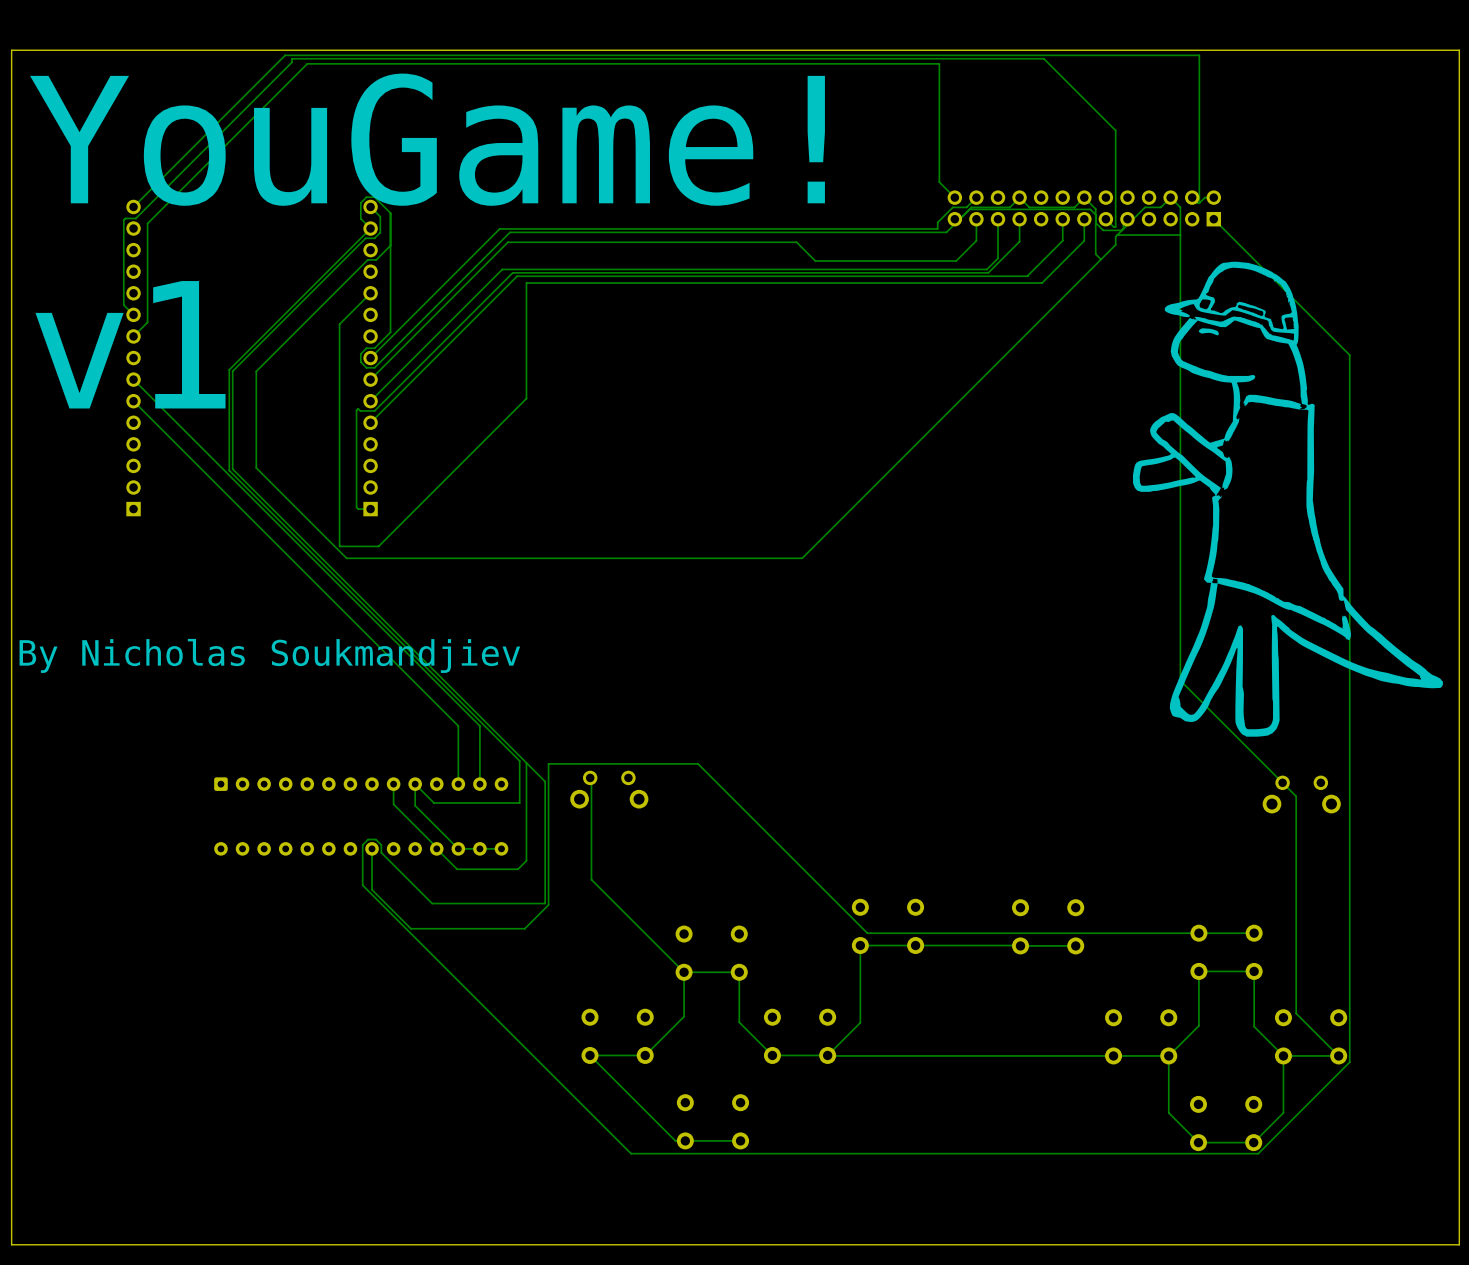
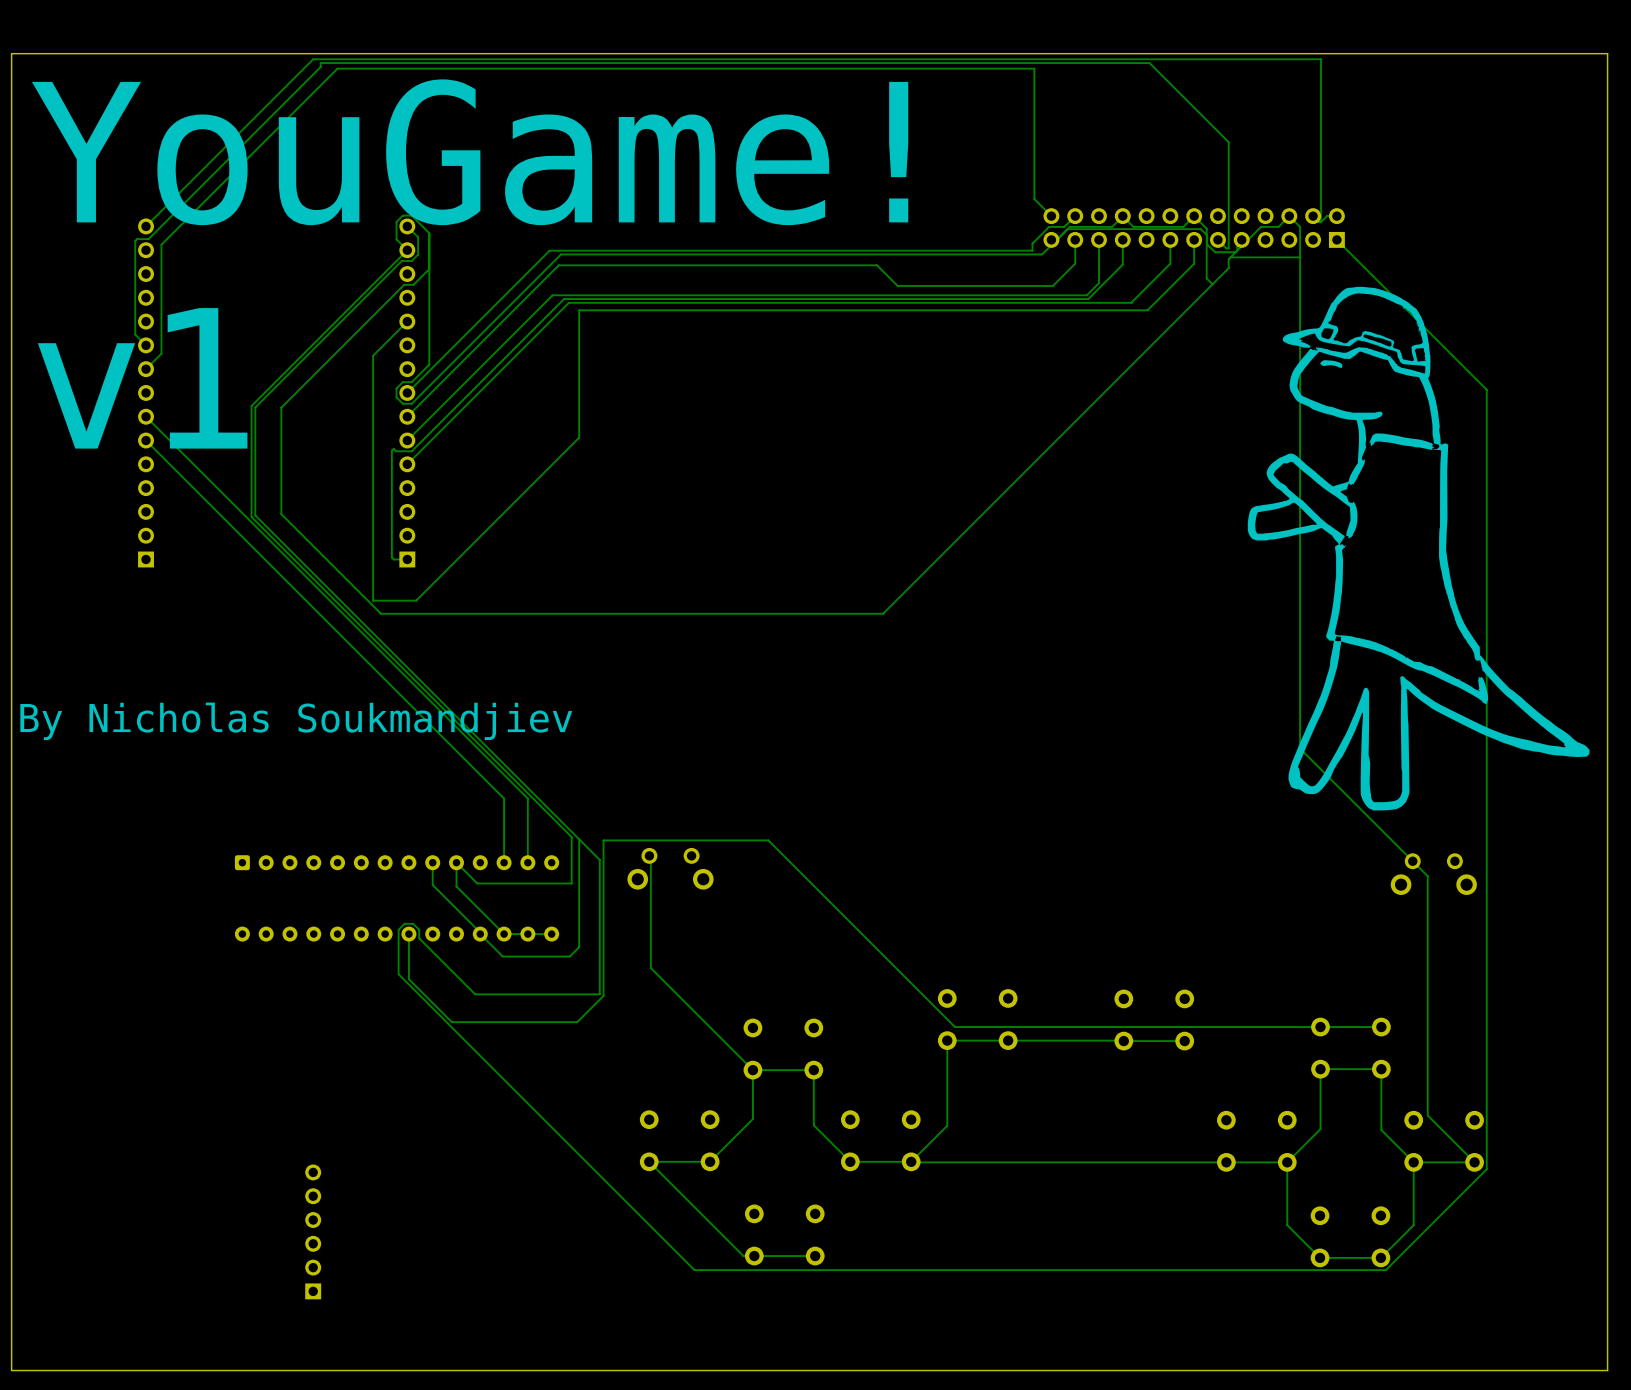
part: none -> (313, 1231)

